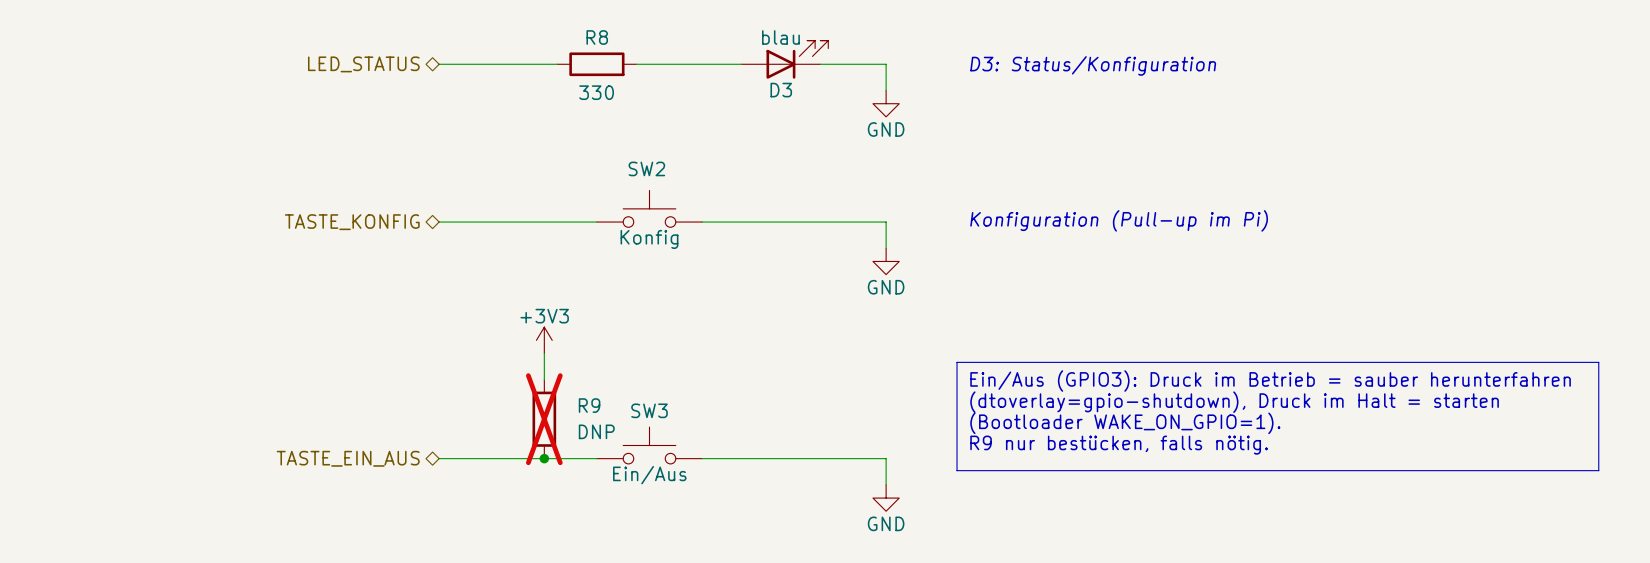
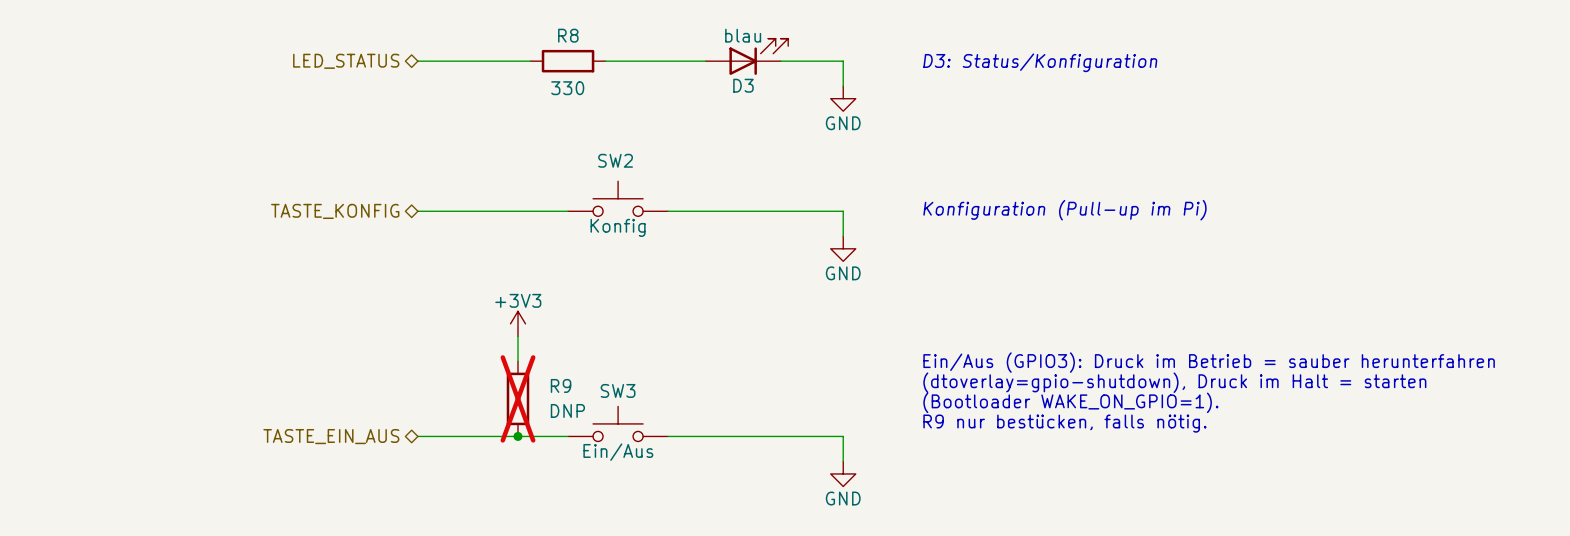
line: (957, 362) (1598, 362) (1598, 470) (957, 470) (957, 362) -> none

